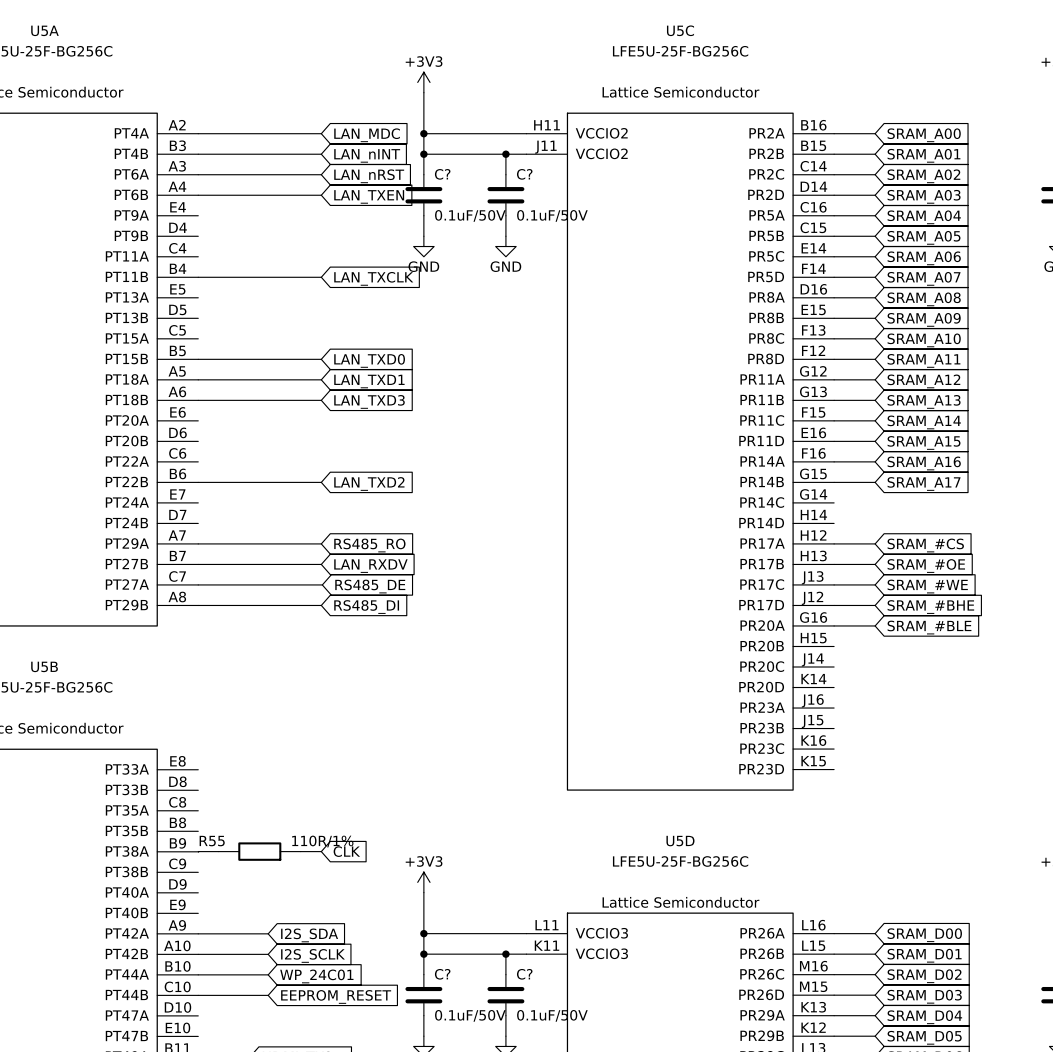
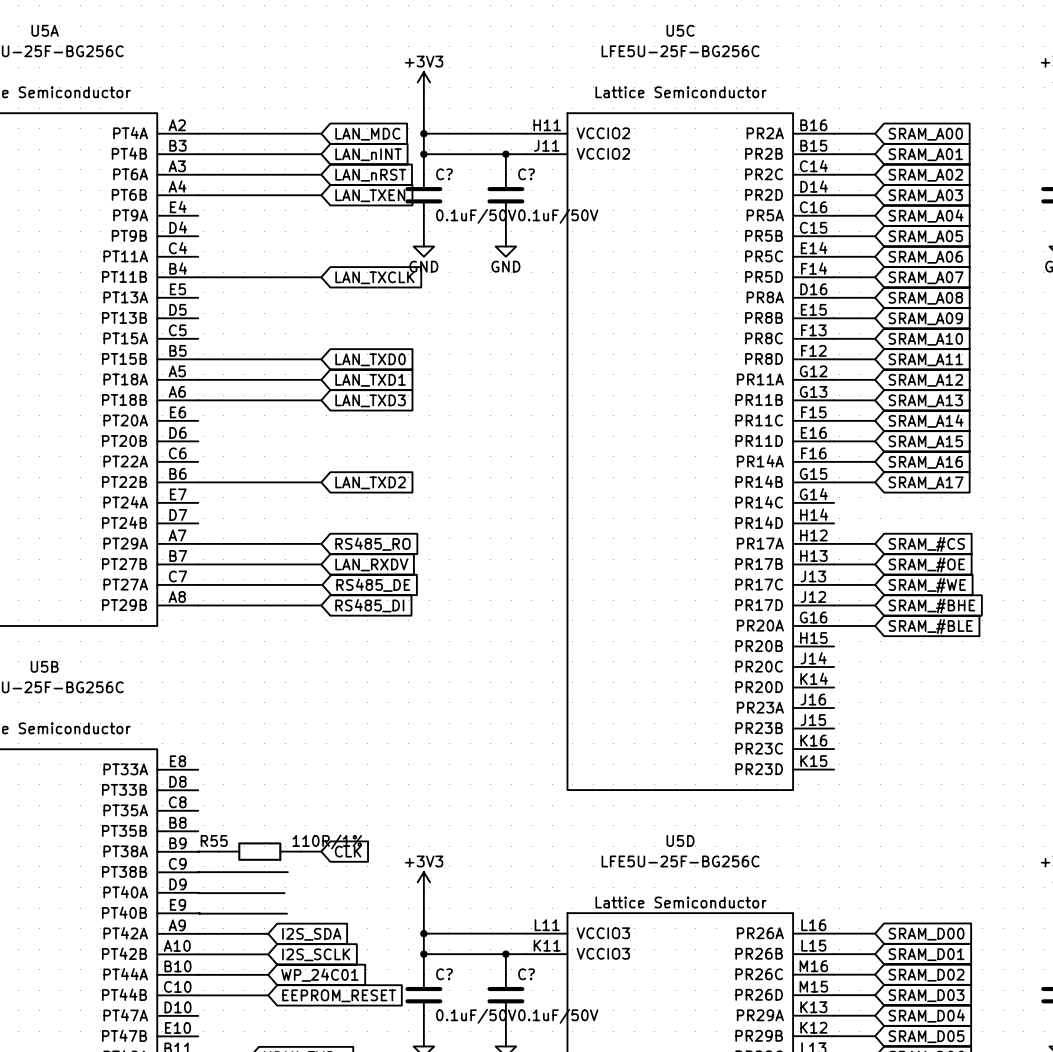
wire: none -> (287, 872) (198, 872)
wire: none -> (198, 892) (284, 893)
wire: none -> (198, 913) (287, 913)

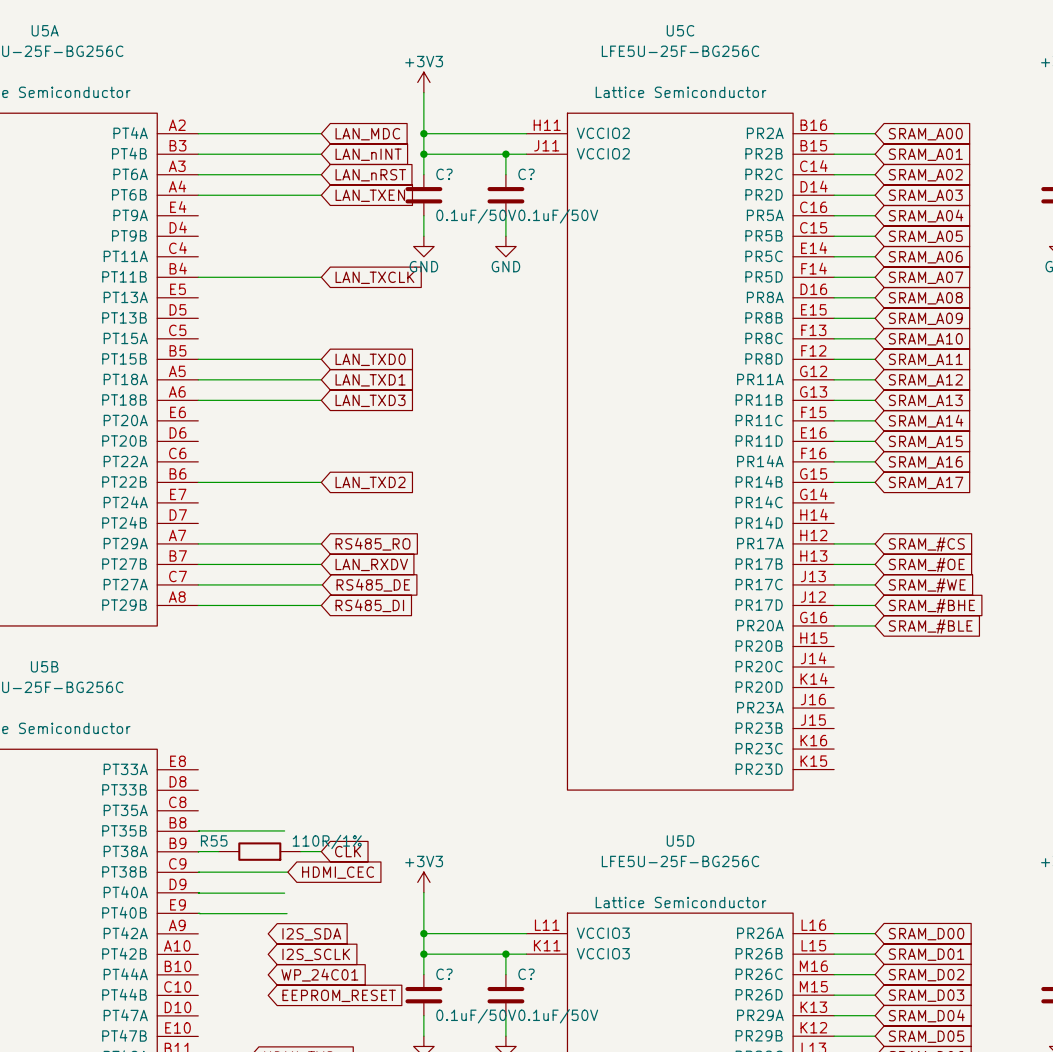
wire: none -> (284, 830) (198, 831)
global label: none -> HDMI_CEC (338, 872)
wire: (198, 933) (268, 933) -> none
wire: (198, 954) (268, 954) -> none
wire: (198, 974) (268, 974) -> none
wire: (198, 995) (268, 995) -> none

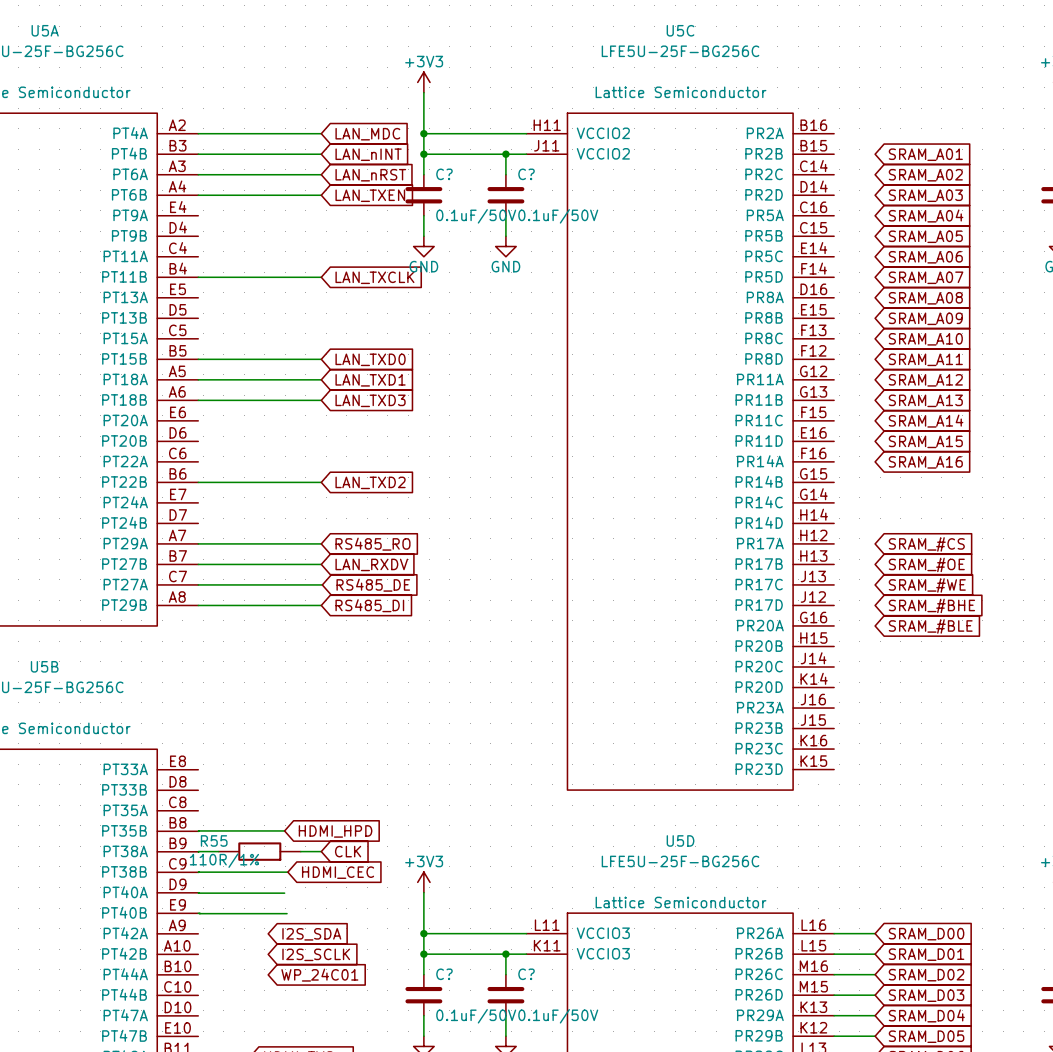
wire: (834, 133) (875, 133) -> none
global label: SRAM_A00 (925, 134) -> none
wire: (834, 154) (875, 154) -> none
wire: (834, 174) (875, 174) -> none
wire: (834, 195) (875, 195) -> none
wire: (834, 215) (875, 215) -> none
wire: (834, 236) (875, 236) -> none
wire: (834, 256) (875, 256) -> none
wire: (834, 277) (875, 277) -> none
wire: (834, 297) (875, 297) -> none
wire: (834, 318) (875, 318) -> none
wire: (834, 338) (875, 338) -> none
wire: (834, 359) (875, 359) -> none
wire: (834, 379) (875, 379) -> none
wire: (834, 400) (875, 400) -> none
wire: (834, 420) (875, 420) -> none
wire: (834, 441) (875, 441) -> none
wire: (834, 461) (875, 461) -> none
wire: (834, 482) (875, 482) -> none
global label: SRAM_A17 (926, 482) -> none
wire: (834, 543) (875, 543) -> none
wire: (834, 564) (875, 564) -> none
wire: (834, 584) (875, 584) -> none
wire: (834, 605) (875, 605) -> none
wire: (834, 625) (875, 625) -> none
global label: none -> HDMI_HPD (335, 831)
R55 value position: 110R/1% (327, 841) -> 110R/1% (224, 860)
global label: EEPROM_RESET (339, 995) -> none

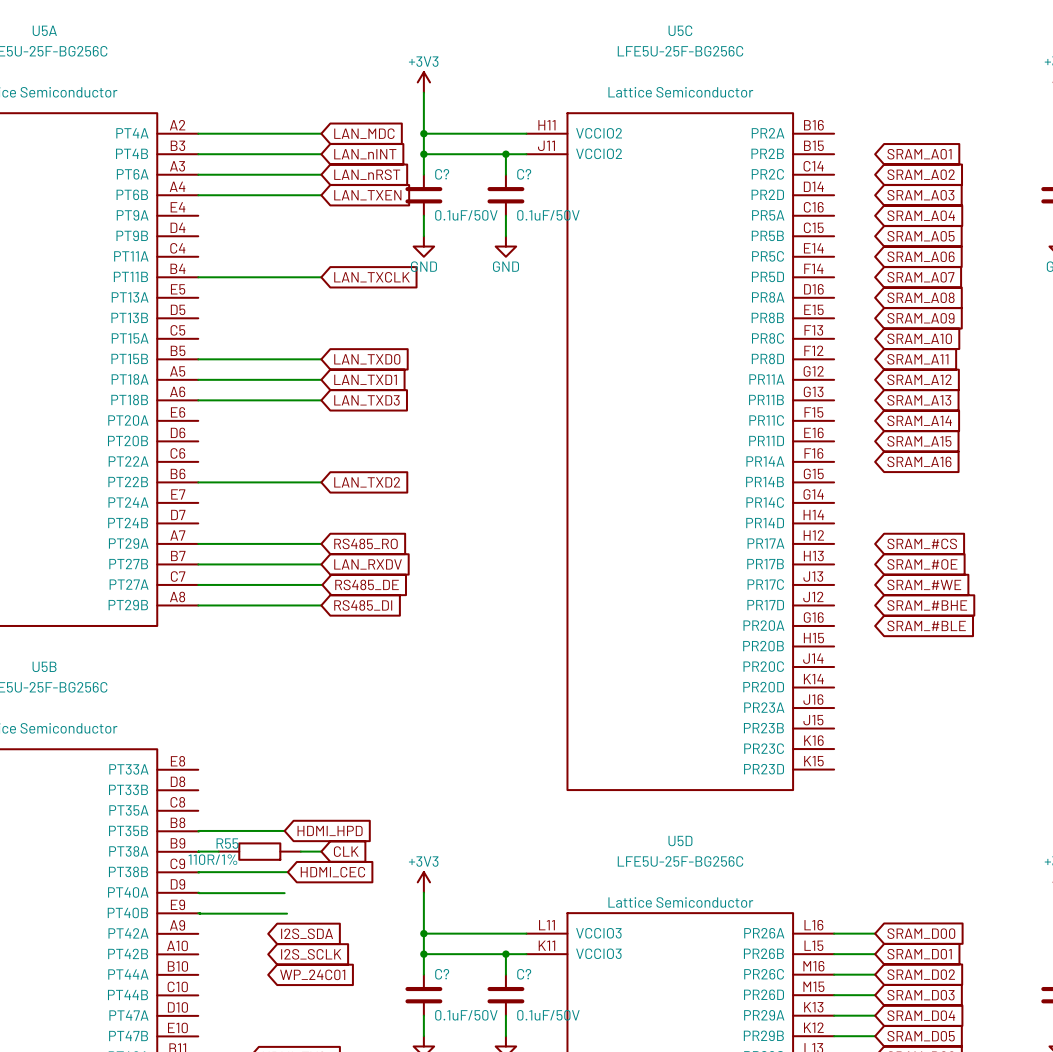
R55 name position: R55 (214, 840) -> R55 (227, 843)

